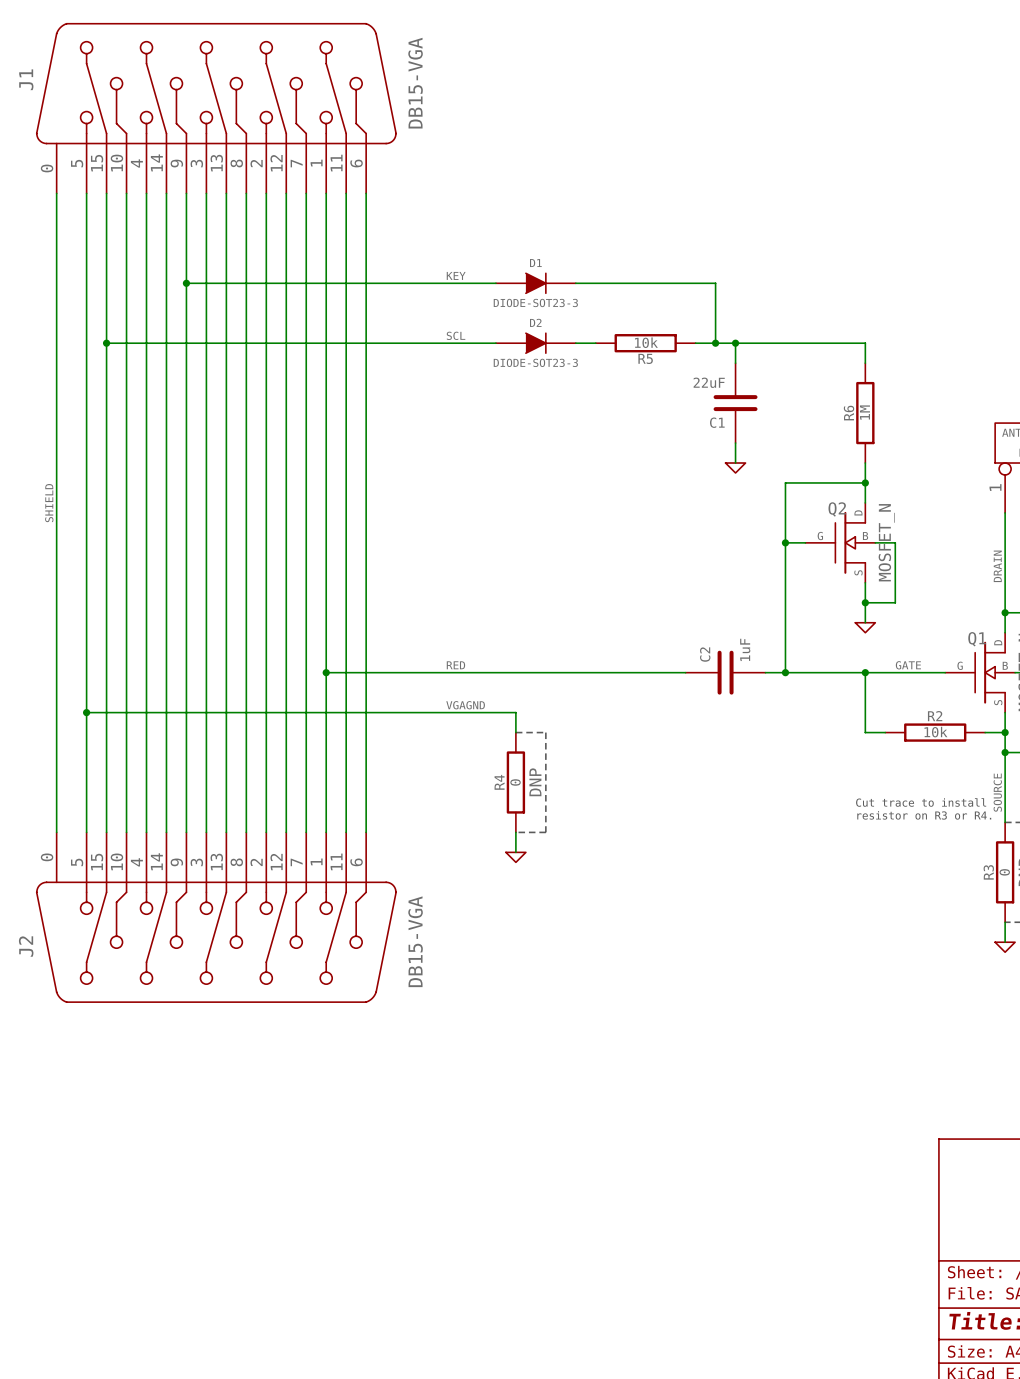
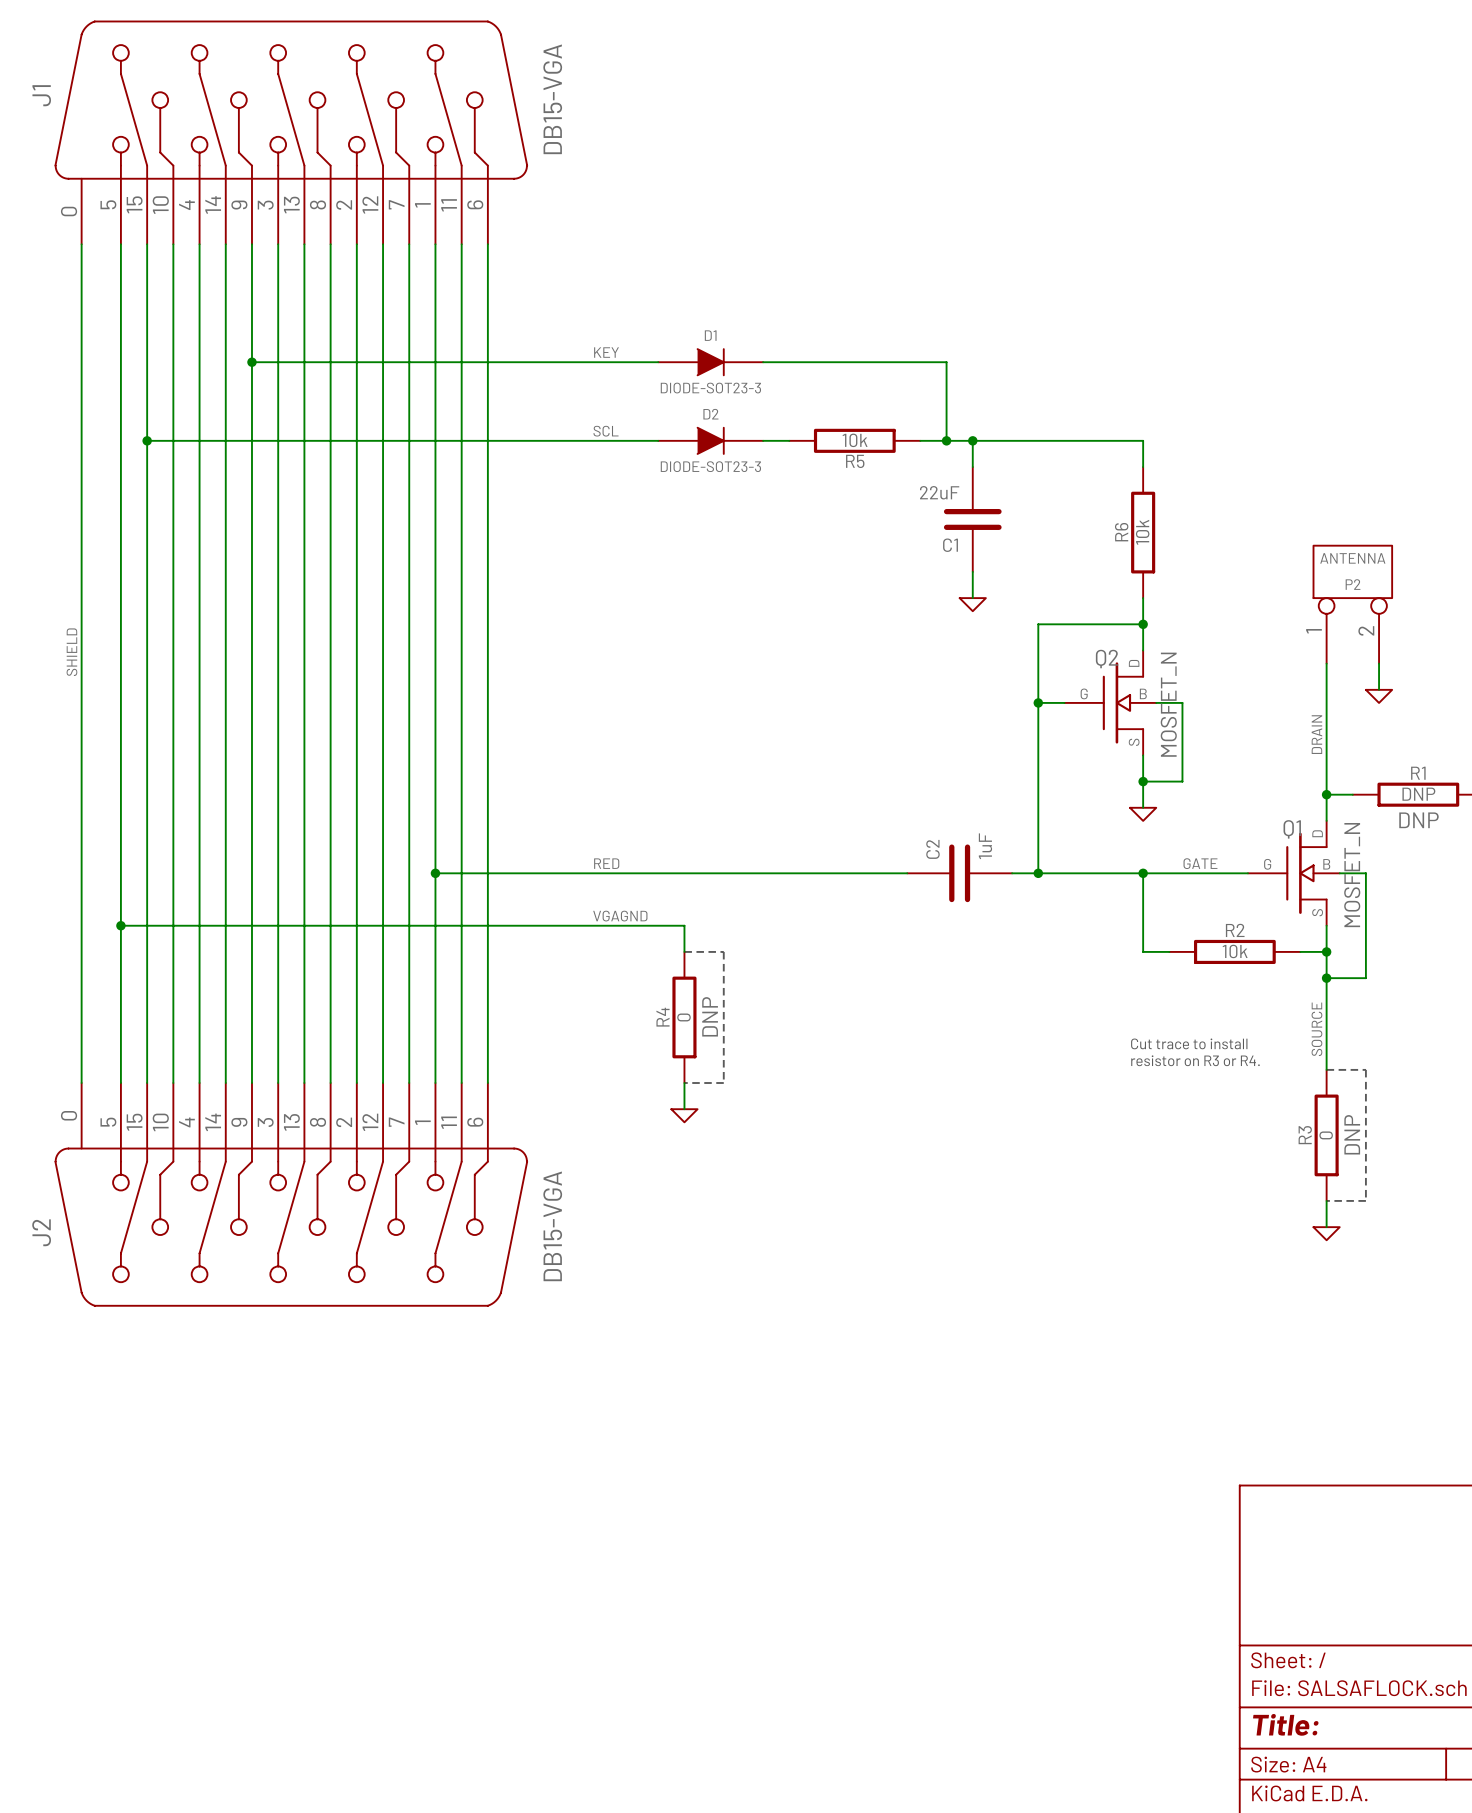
R6 value: 1M (864, 412) -> 10k (1142, 532)

